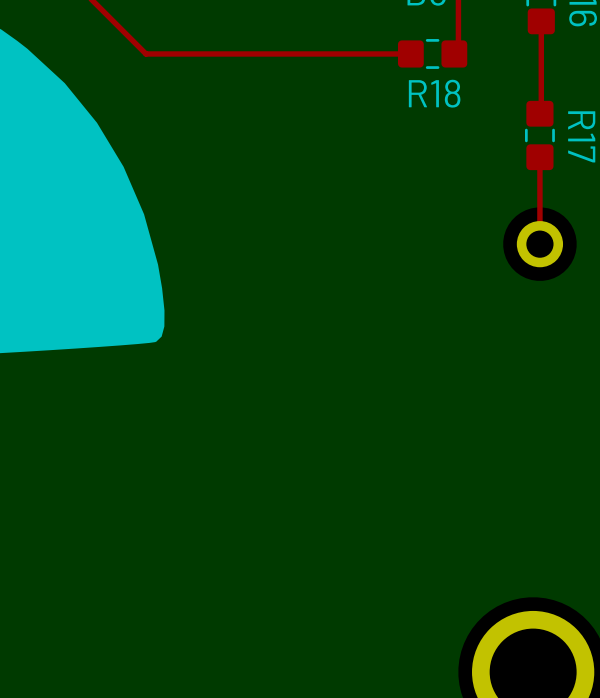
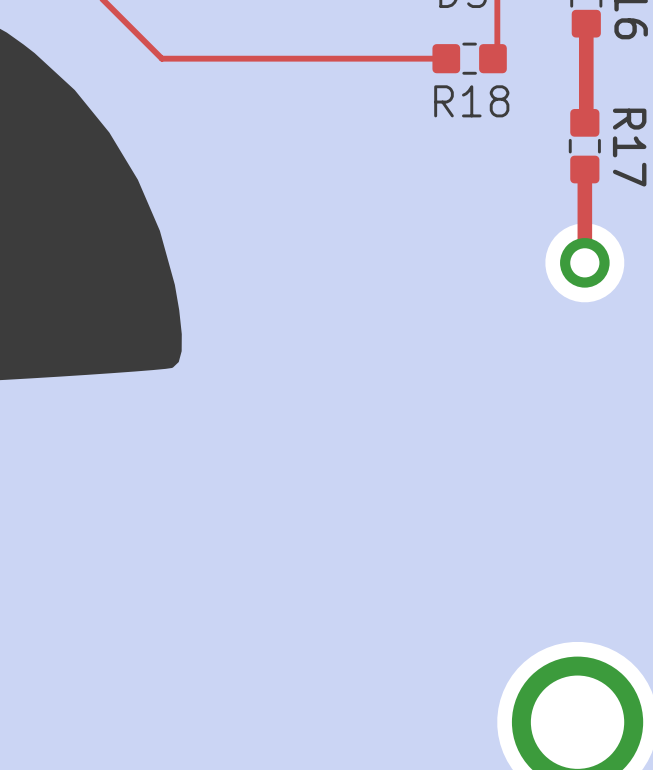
top track width: thin (541, 21) (541, 112) -> thick (586, 23) (586, 121)
top track width: thin (539, 157) (539, 244) -> thick (584, 169) (584, 262)

